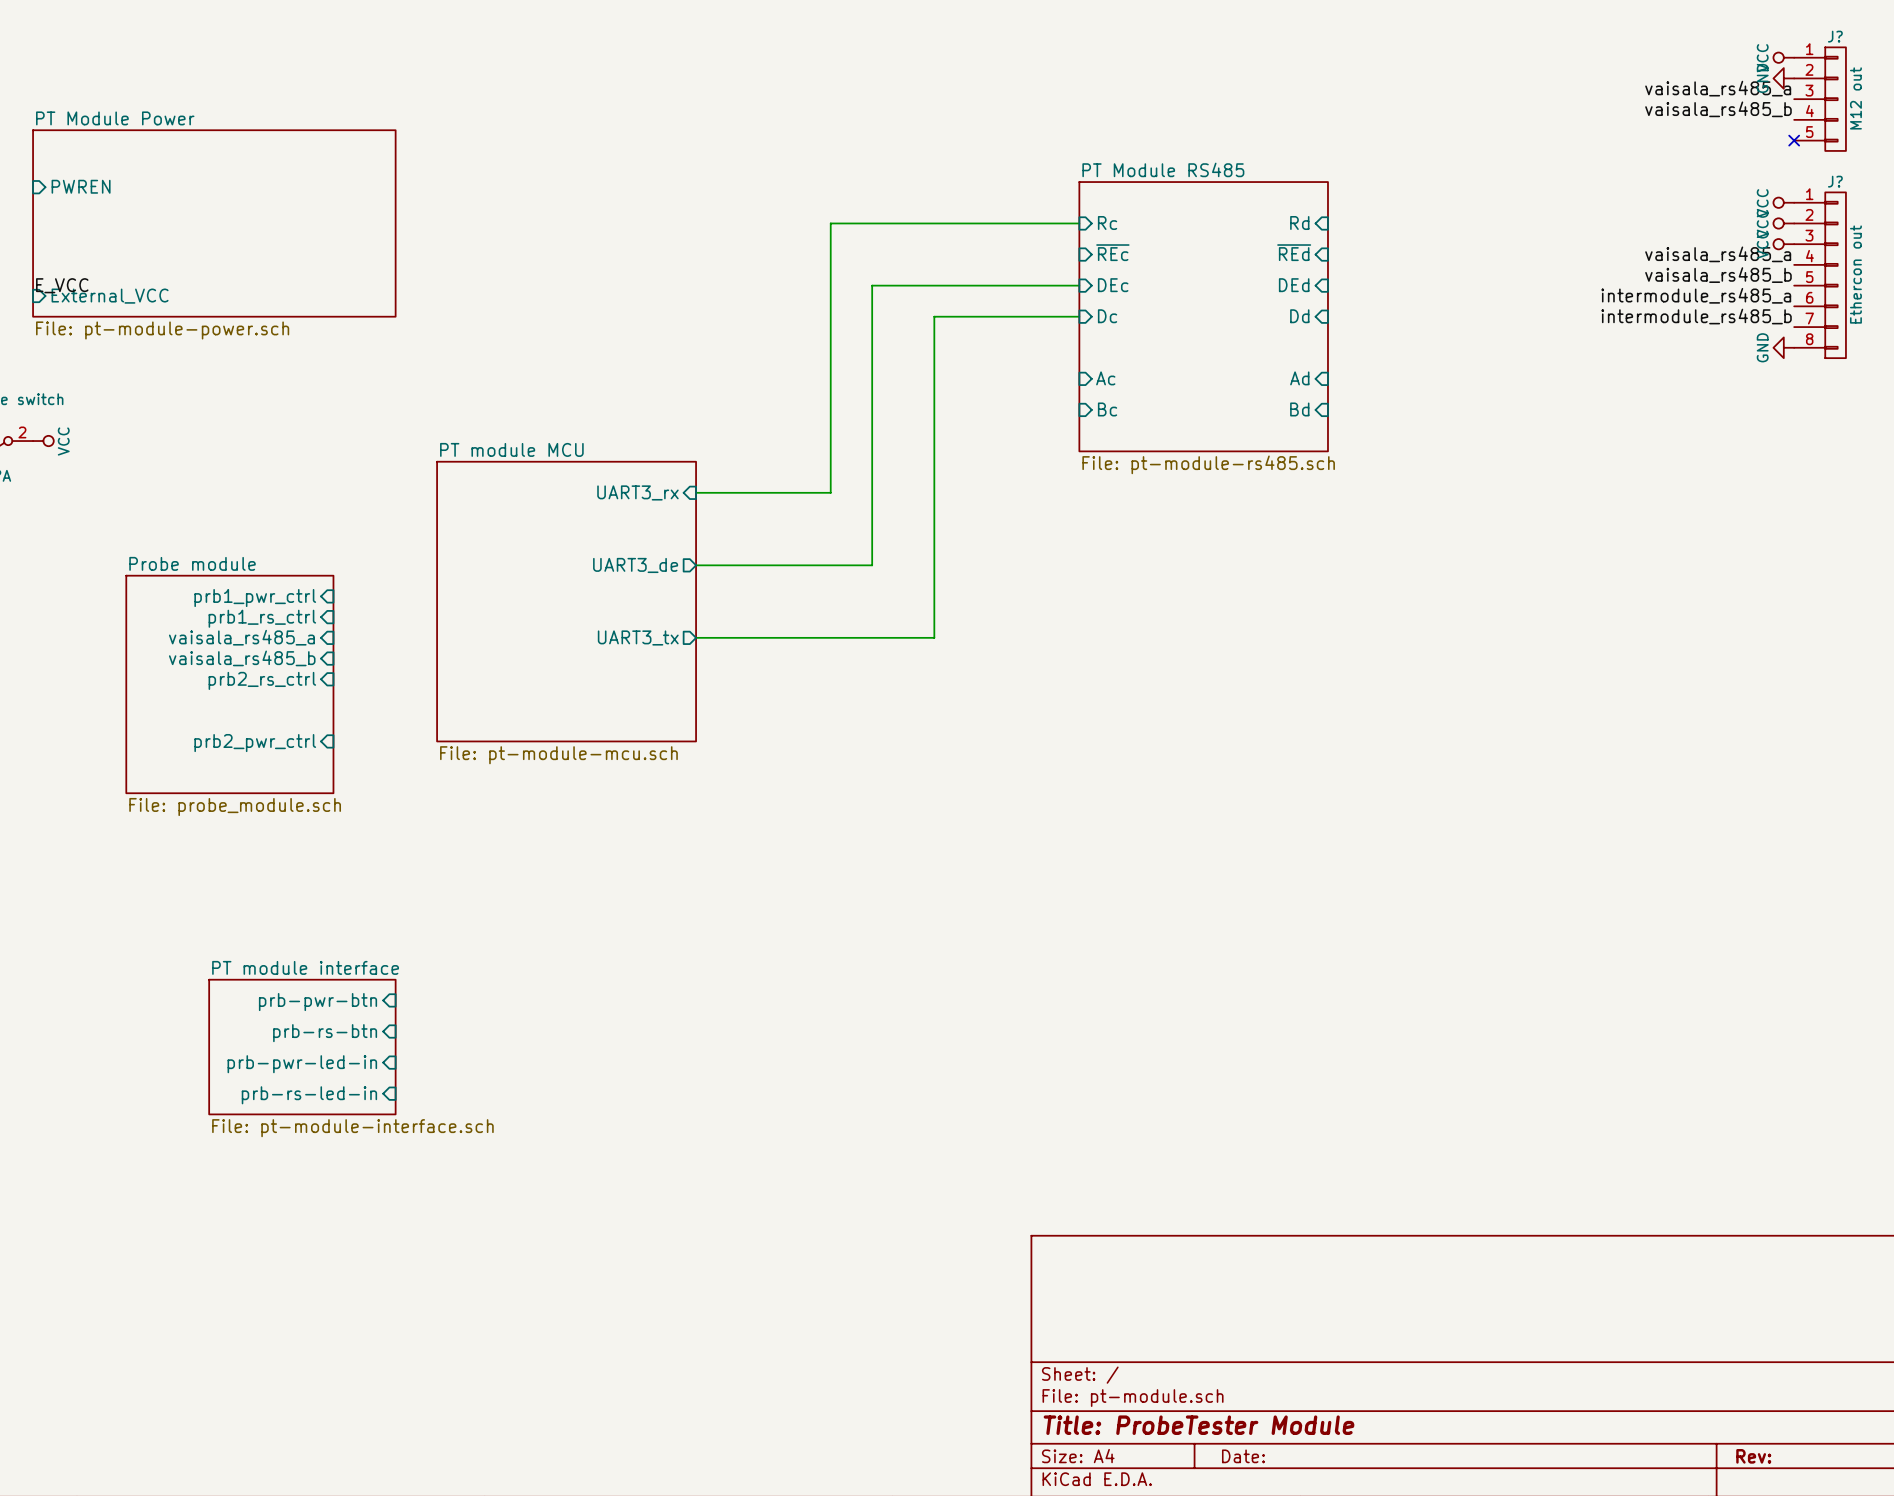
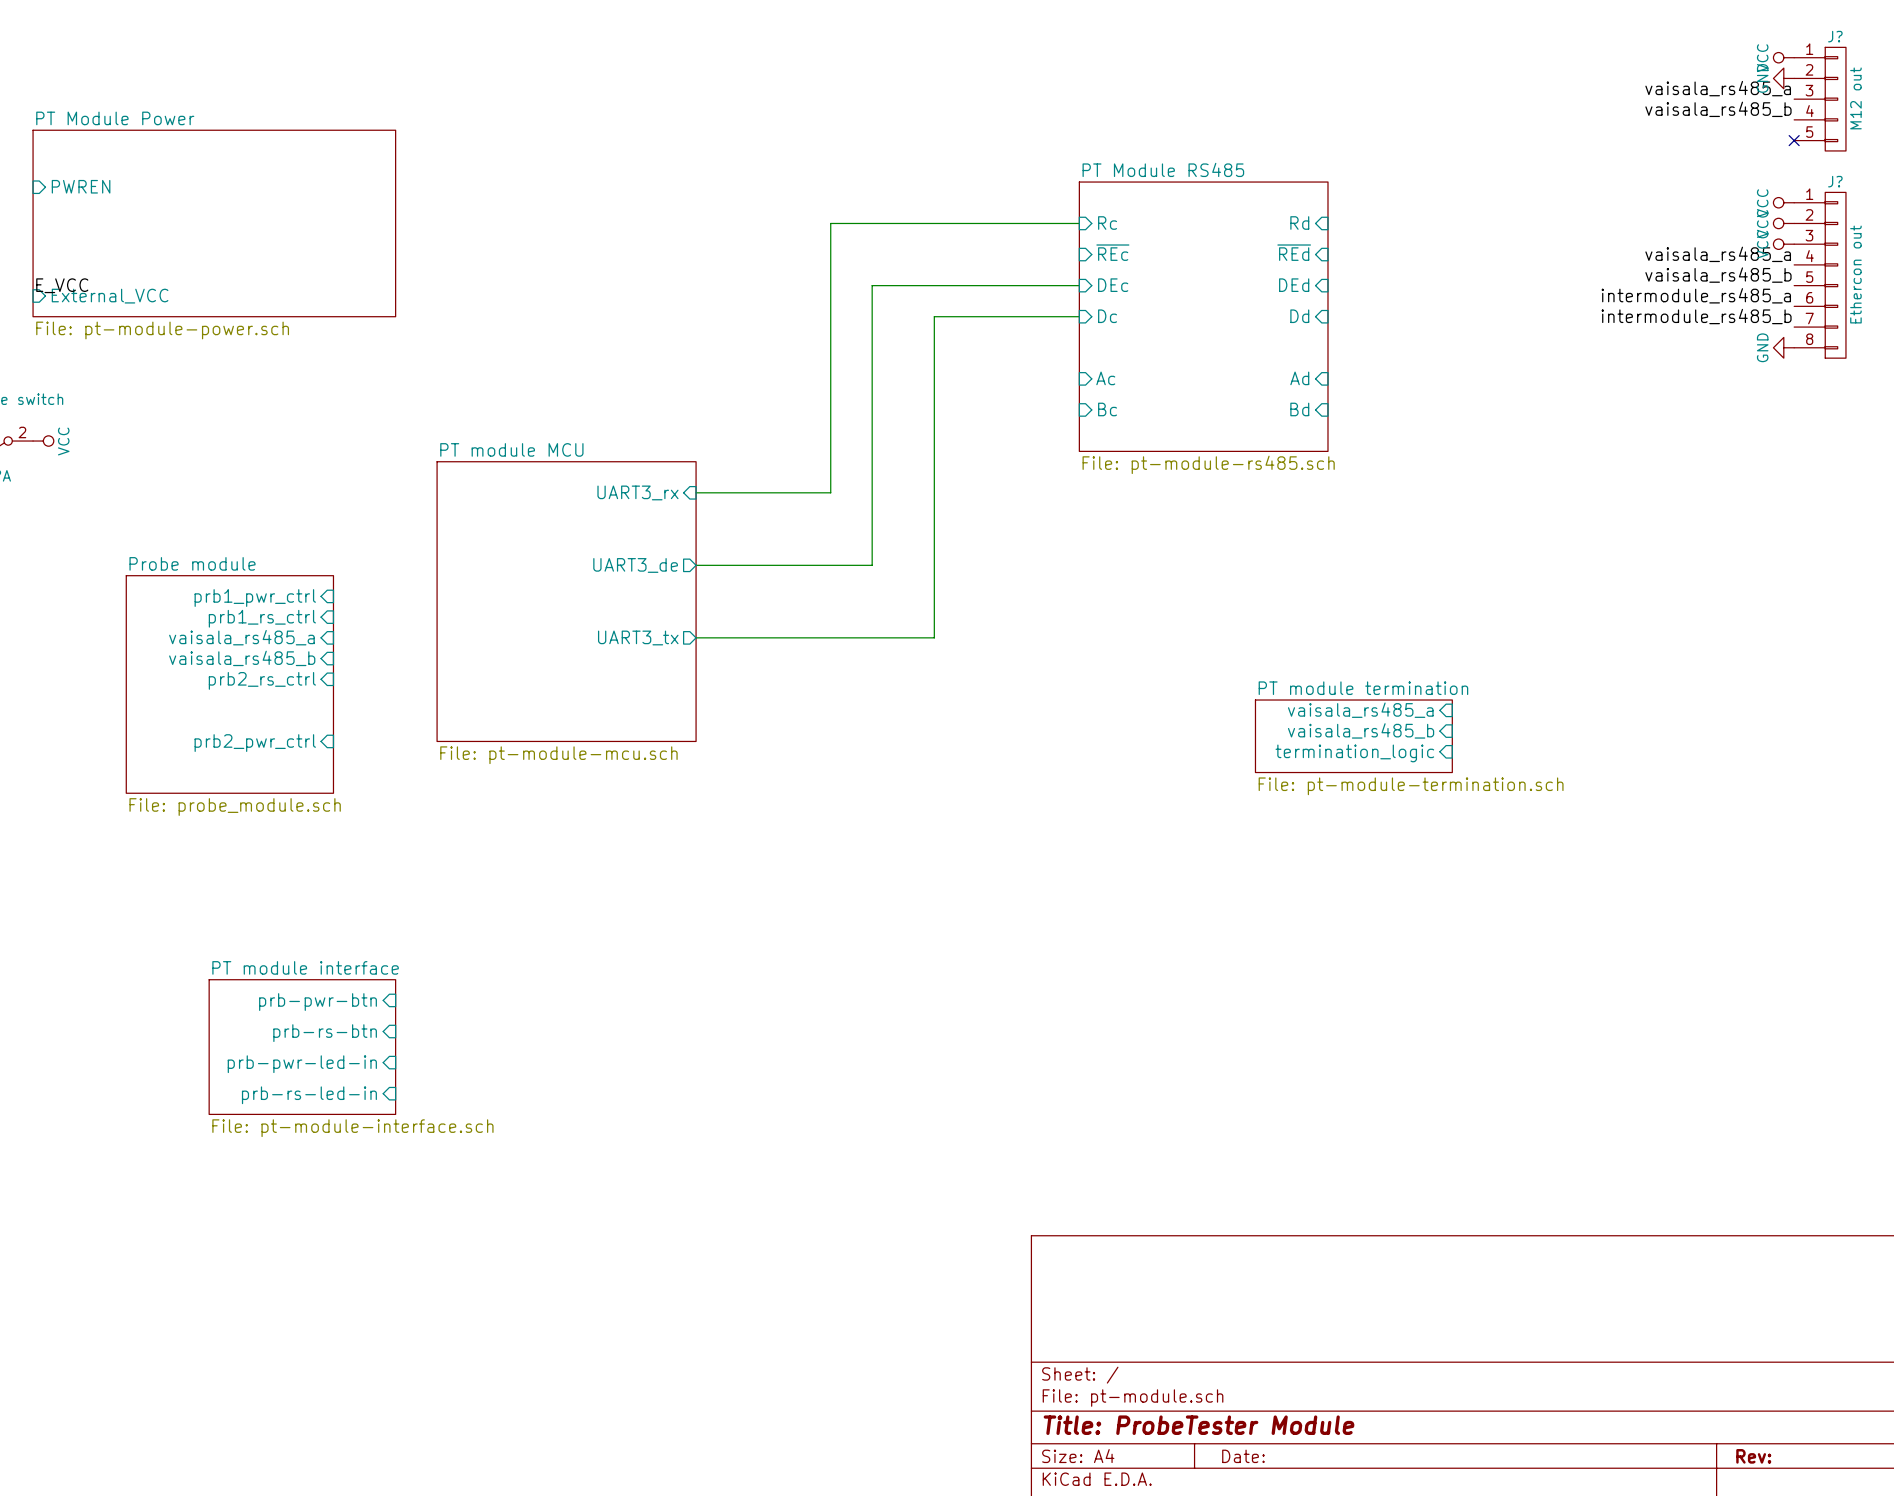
sheet pin: none -> vaisala_rs485_a (1360, 710)
sheet pin: none -> vaisala_rs485_b (1361, 730)
sheet PT module termination: none -> File: pt-module-termination.sch (1353, 736)
sheet pin: none -> termination_logic (1354, 753)

